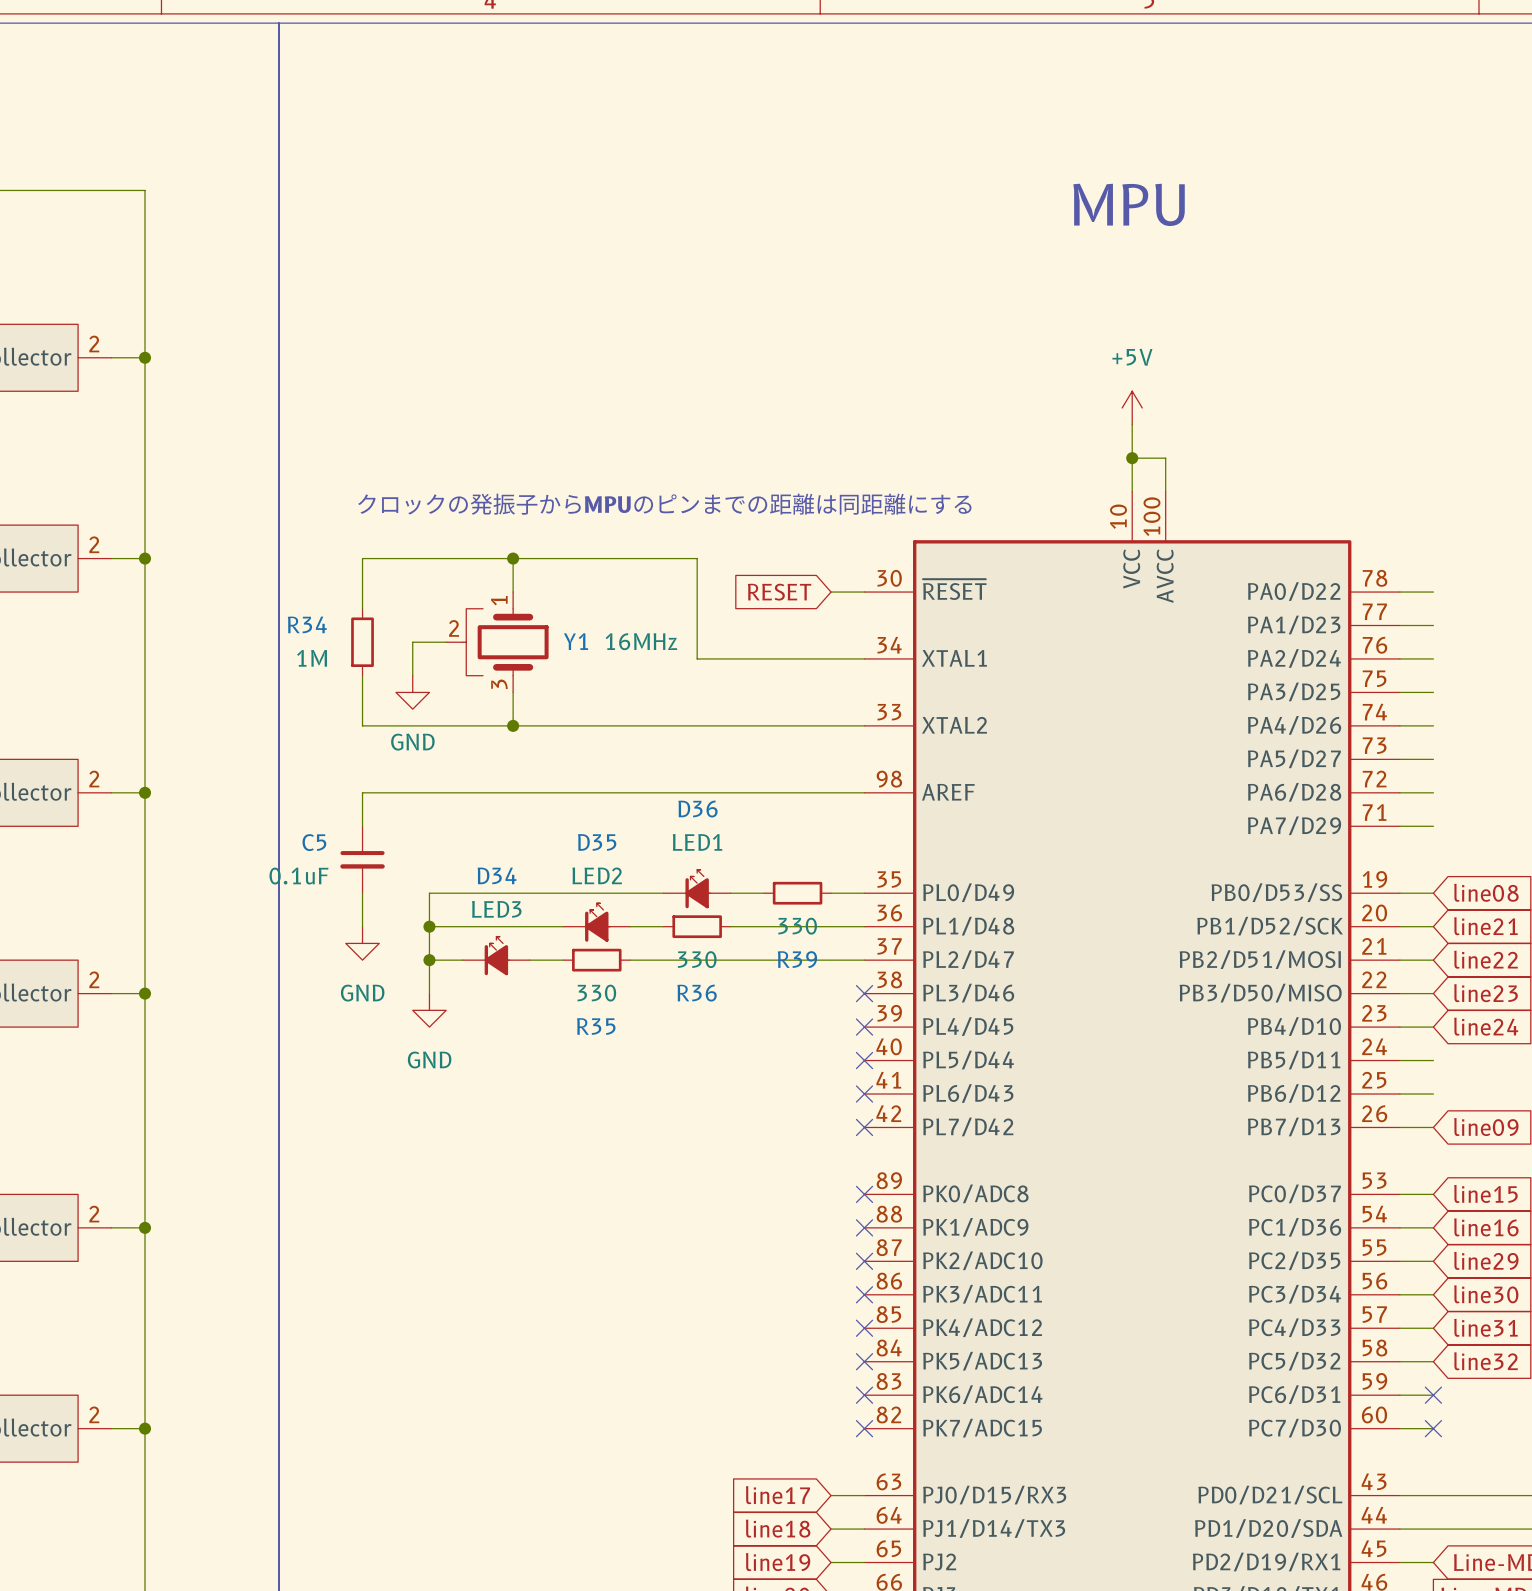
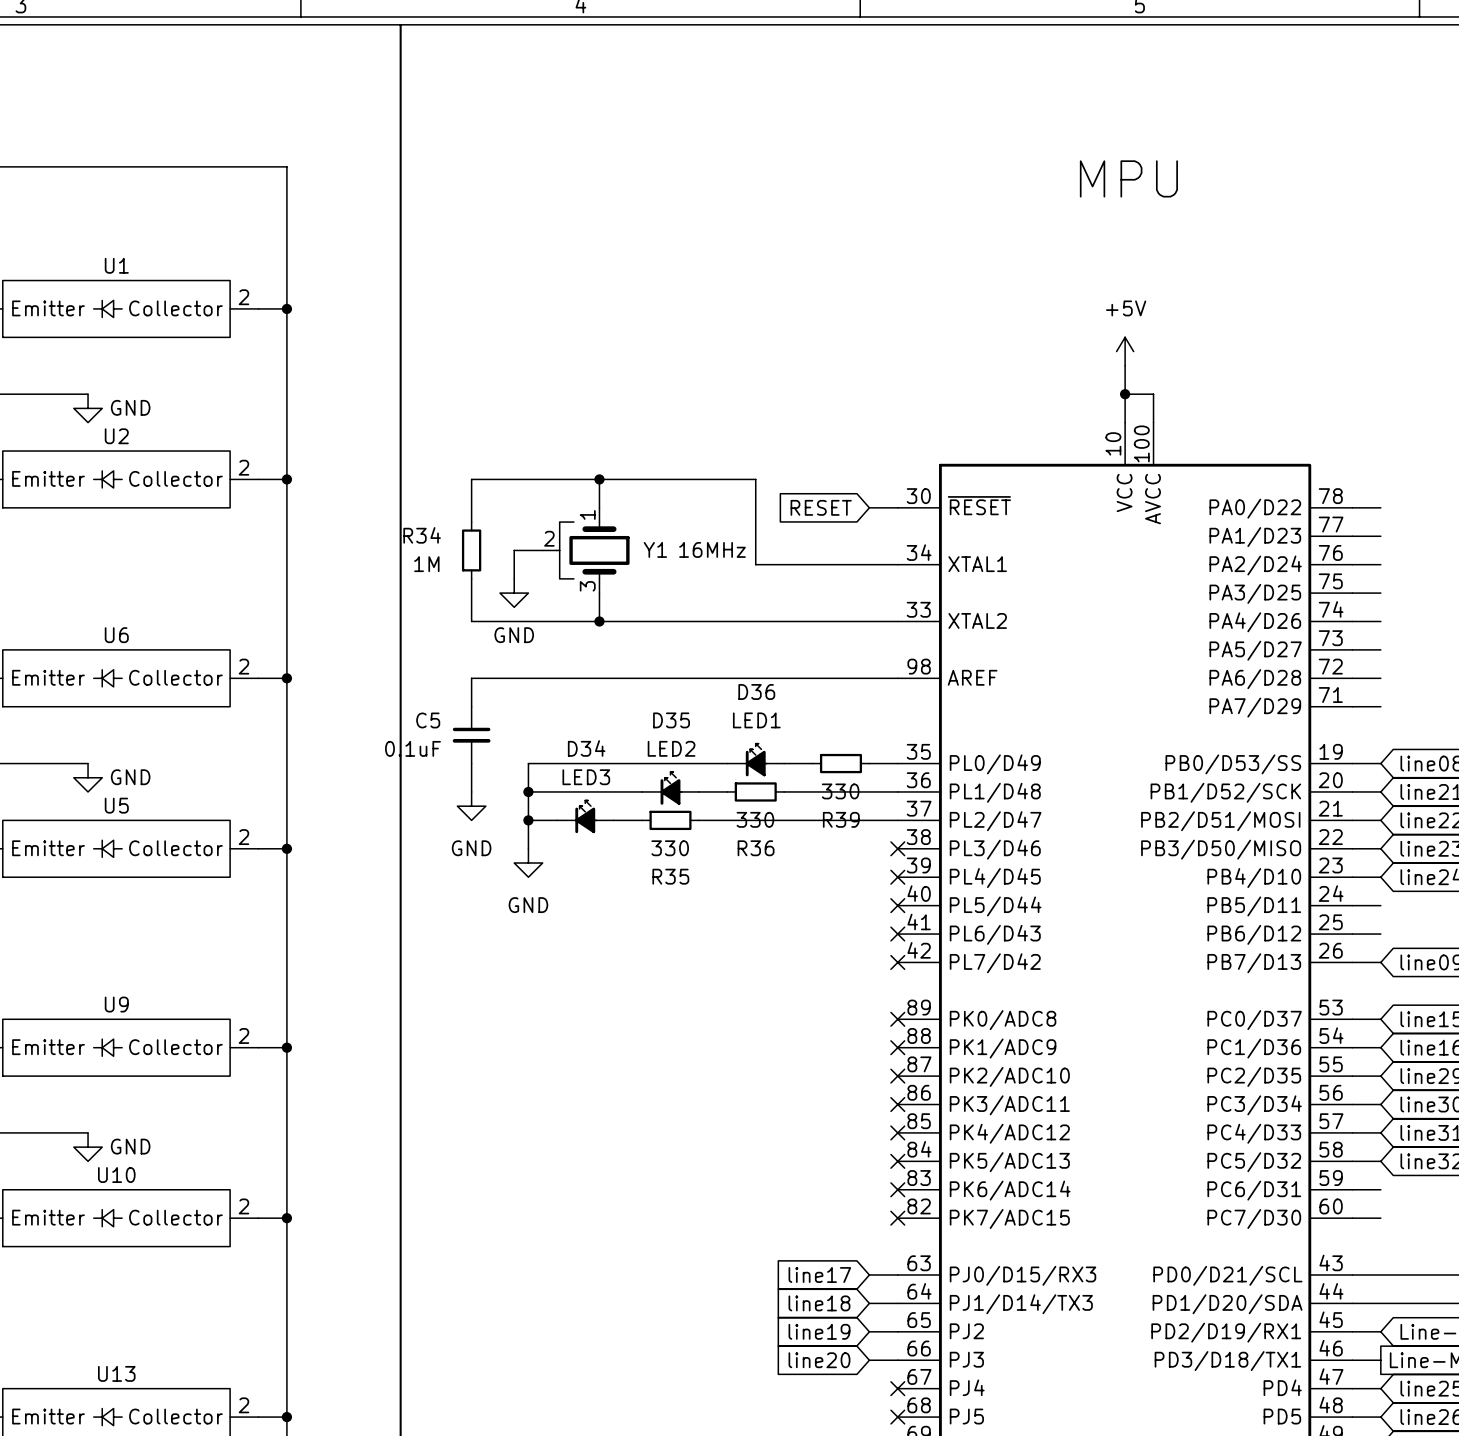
text: クロックの発振子からMPUのピンまでの距離は同距離にする (664, 504) -> none
no-connect mark: (1433, 1395) -> none
no-connect mark: (1433, 1428) -> none

